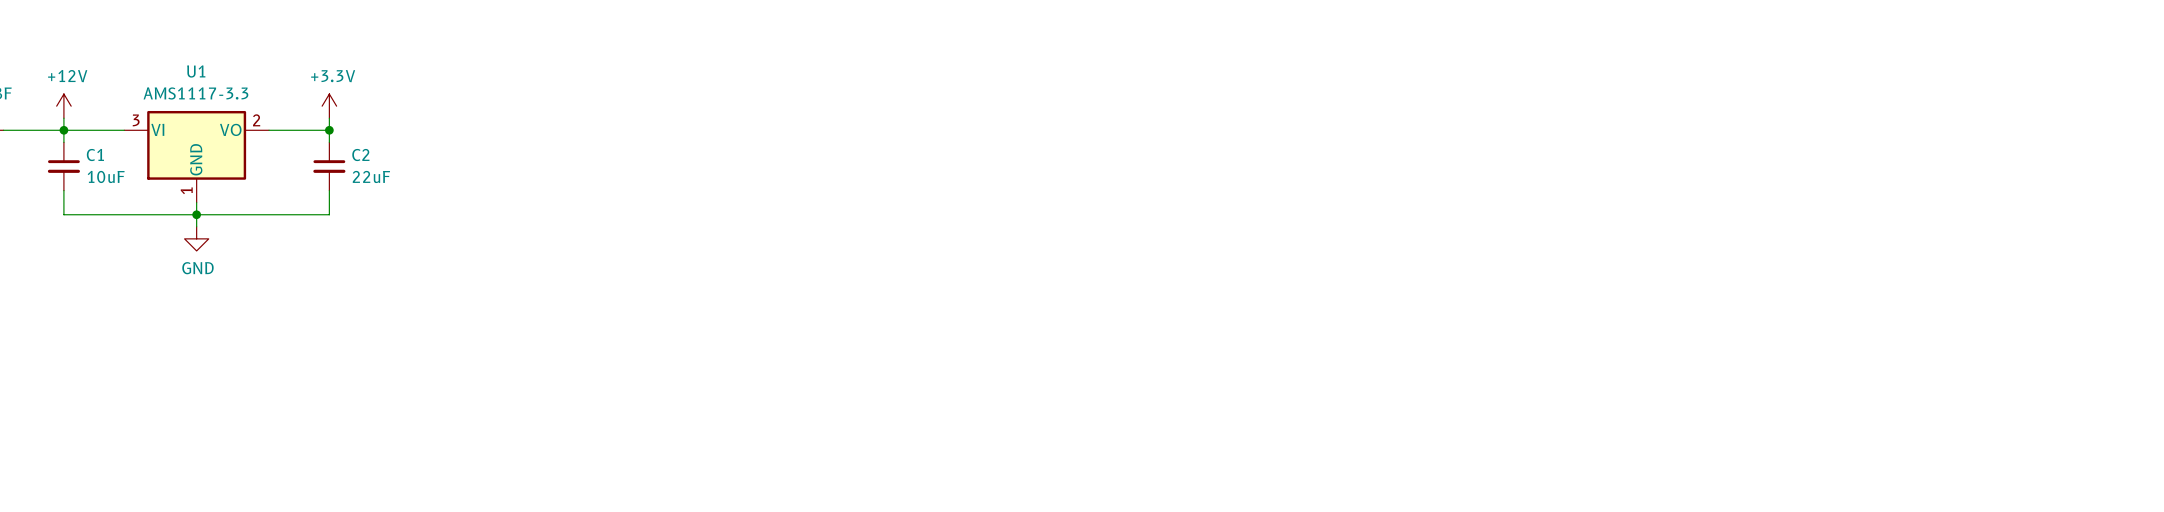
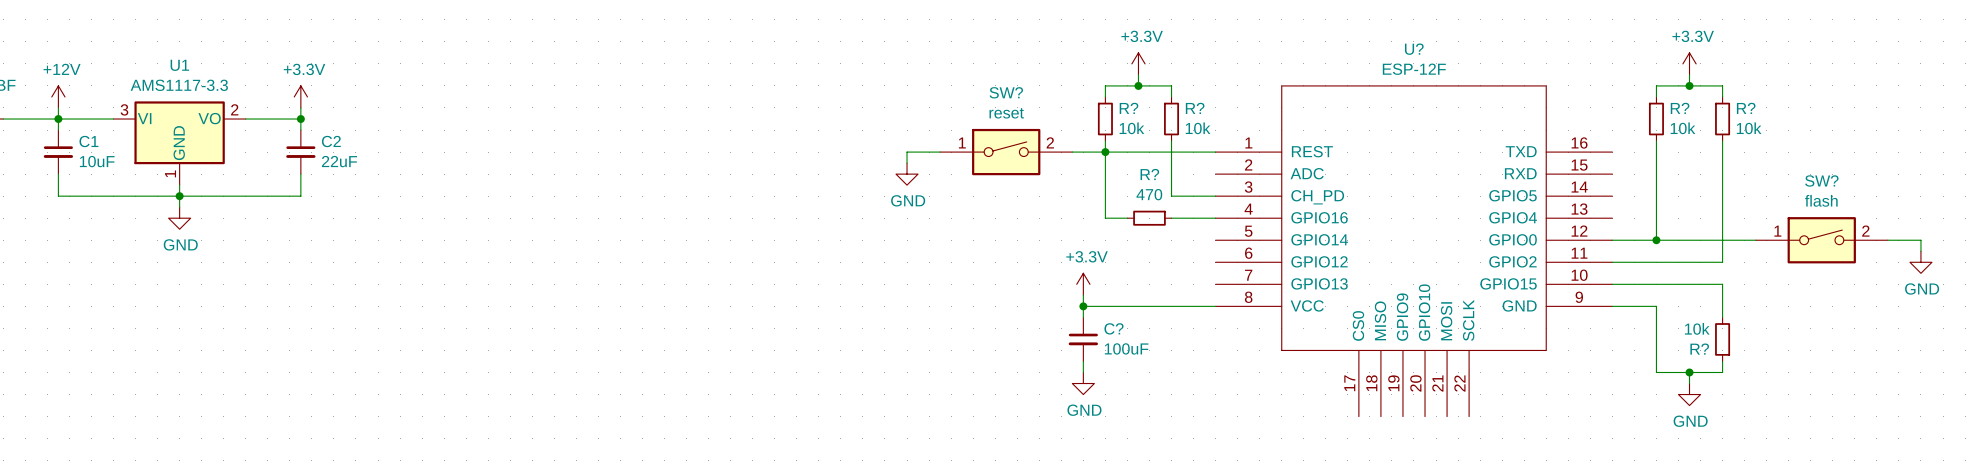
power symbol: none -> +3.3V (1138, 63)
power symbol: none -> +3.3V (1689, 63)
wire: none -> (1138, 74) (1138, 85)
wire: none -> (1689, 74) (1689, 85)
junction: none -> (1138, 85)
junction: none -> (1689, 85)
wire: none -> (1105, 96) (1105, 85) (1171, 85) (1171, 96)
wire: none -> (1656, 96) (1656, 85) (1722, 85) (1722, 96)
R?: none -> 10k (1105, 119)
R?: none -> 10k (1171, 119)
R?: none -> 10k (1656, 119)
R?: none -> 10k (1722, 119)
wire: none -> (1105, 141) (1105, 218) (1127, 218)
wire: none -> (1171, 141) (1171, 196) (1215, 196)
wire: none -> (1656, 141) (1656, 240)
wire: none -> (1722, 141) (1722, 262) (1612, 262)
wire: none -> (940, 152) (907, 152) (907, 163)
SW?: none -> reset (1006, 152)
wire: none -> (1072, 152) (1215, 152)
junction: none -> (1105, 152)
power symbol: none -> GND (907, 174)
R?: none -> 470 (1149, 218)
wire: none -> (1171, 218) (1215, 218)
wire: none -> (1612, 240) (1755, 240)
junction: none -> (1656, 240)
SW?: none -> flash (1821, 240)
wire: none -> (1887, 240) (1920, 240) (1920, 251)
U?: none -> ESP-12F (1413, 251)
power symbol: none -> GND (1920, 262)
power symbol: none -> +3.3V (1083, 284)
wire: none -> (1612, 284) (1722, 284) (1722, 317)
wire: none -> (1083, 295) (1083, 317)
wire: none -> (1083, 306) (1215, 306)
junction: none -> (1083, 306)
wire: none -> (1612, 306) (1656, 306) (1656, 372) (1722, 372) (1722, 361)
C?: none -> 100uF (1083, 339)
R?: none -> 10k (1722, 339)
wire: none -> (1083, 361) (1083, 372)
wire: none -> (1689, 372) (1689, 383)
junction: none -> (1689, 372)
power symbol: none -> GND (1083, 383)
power symbol: none -> GND (1689, 394)

